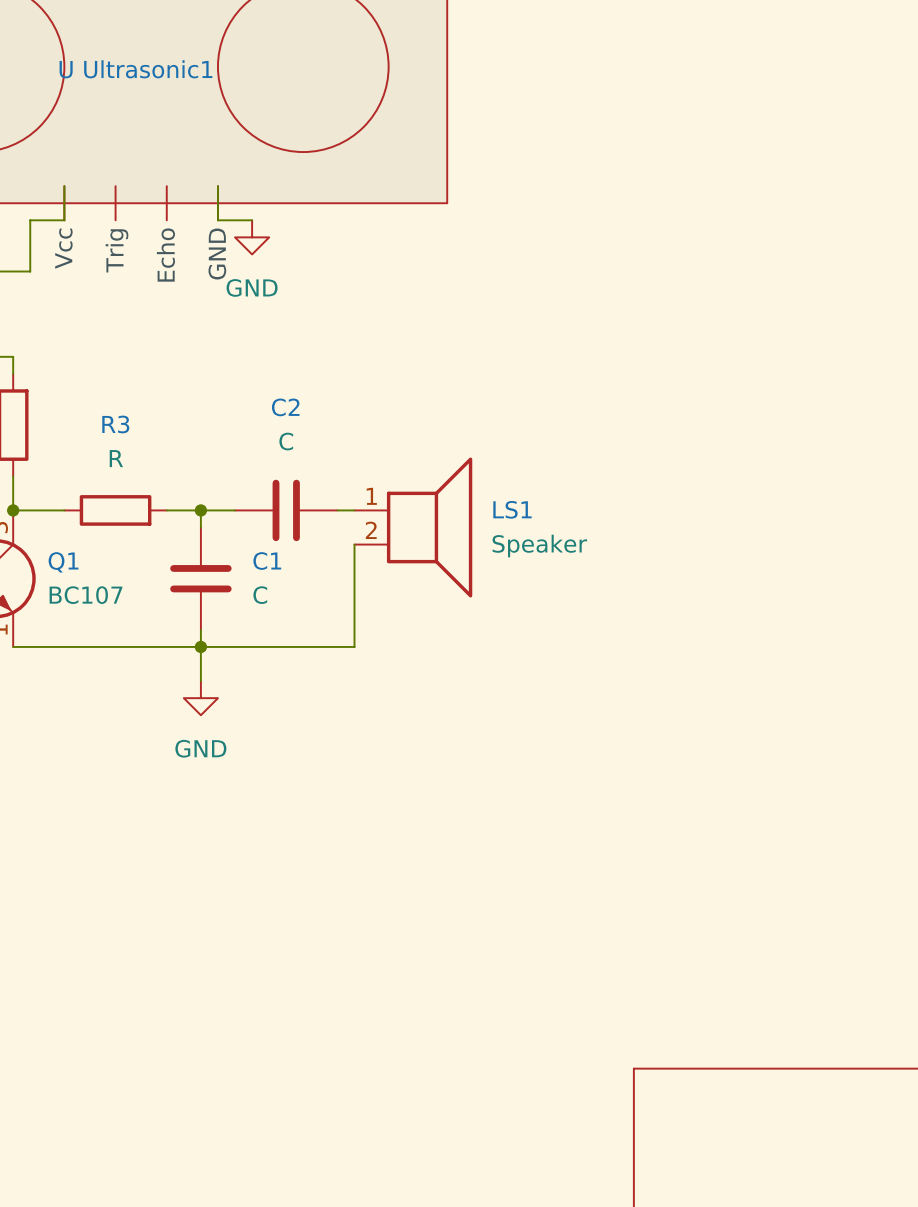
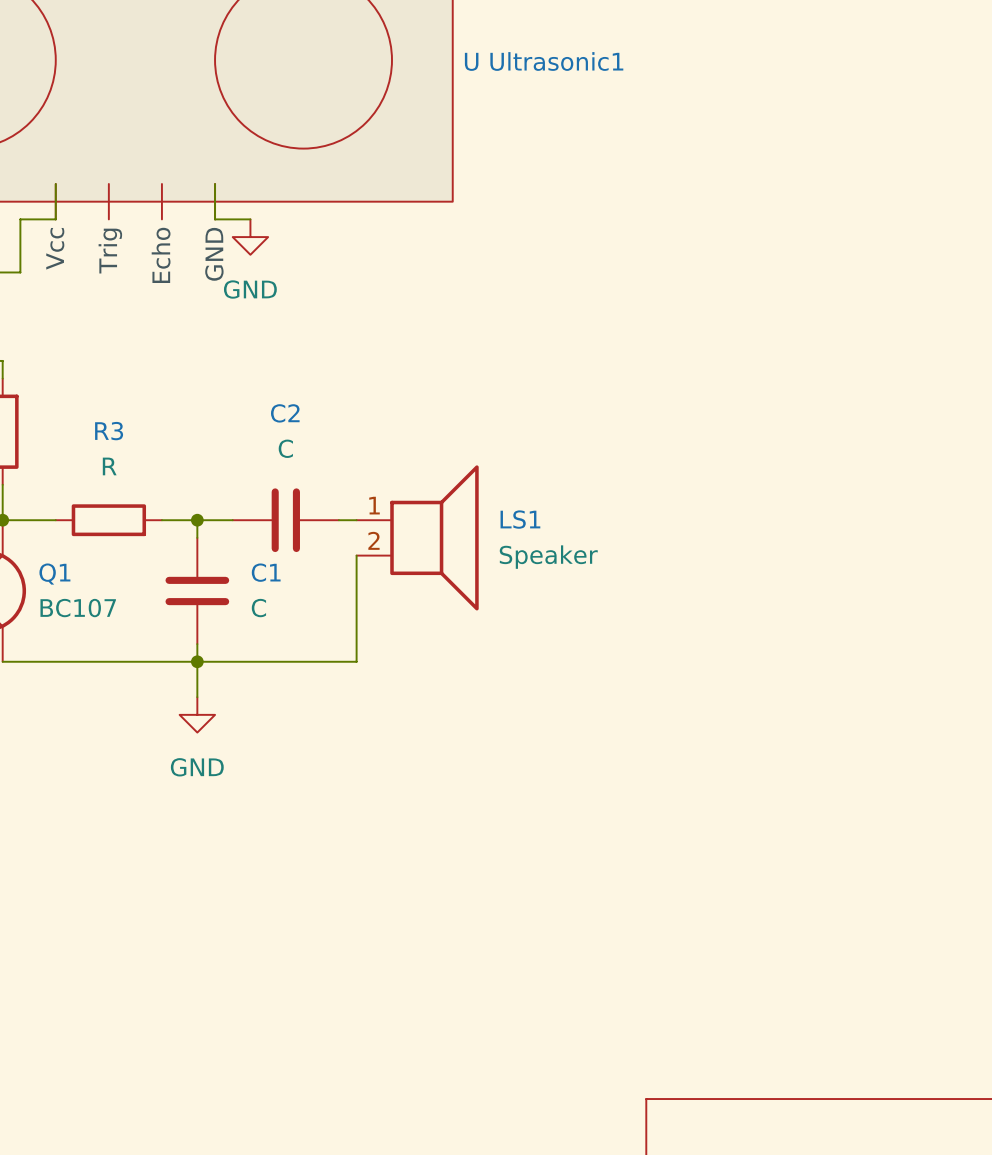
U Ultrasonic1 name position: U Ultrasonic1 (135, 69) -> U Ultrasonic1 (544, 61)

